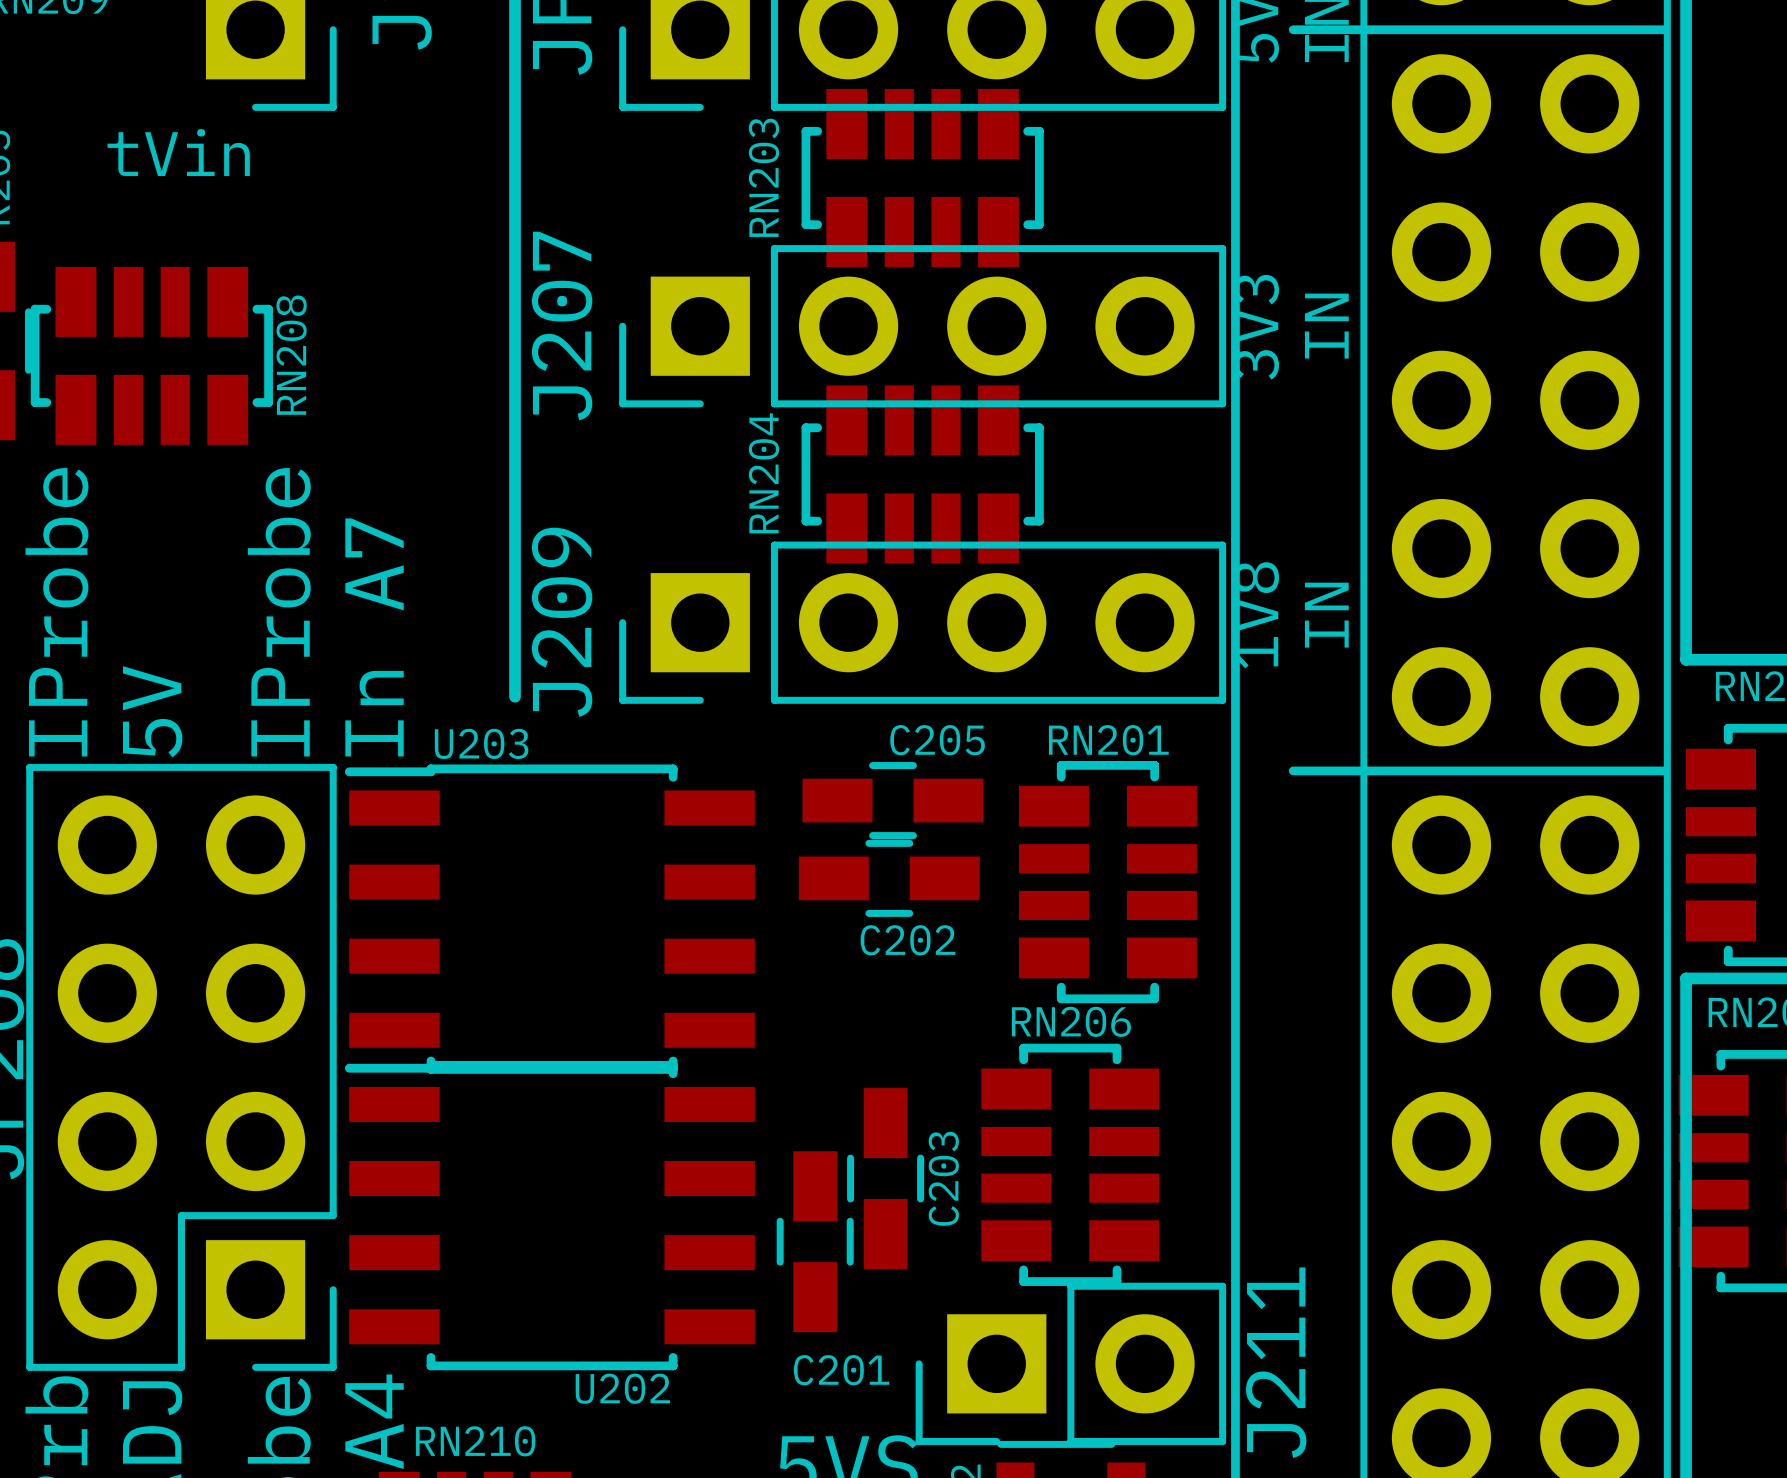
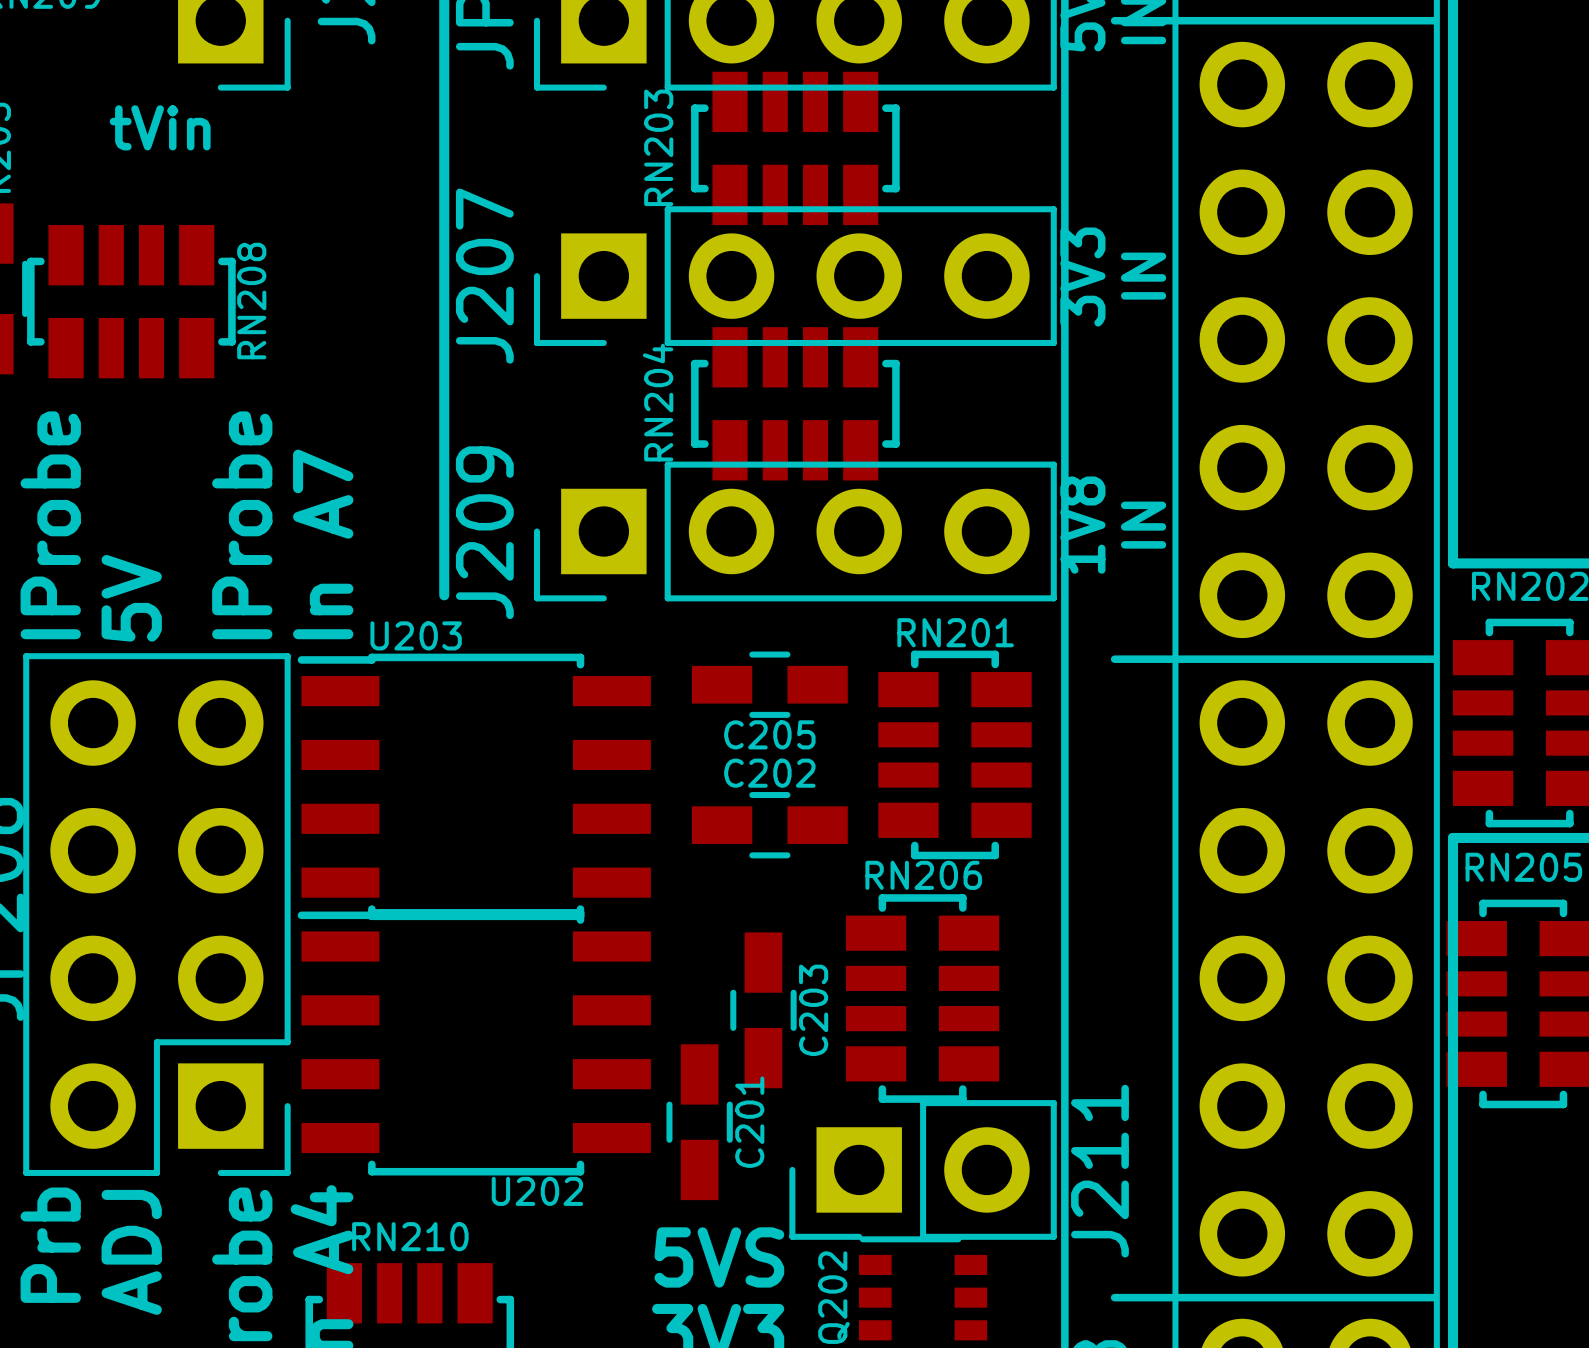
C205 name position: C205 (937, 740) -> C205 (769, 734)
C202 position: (889, 878) -> (769, 825)
C202 name position: C202 (907, 940) -> C202 (769, 773)
C201 position: (815, 1241) -> (699, 1122)
C201 name rotation: 0° (841, 1370) -> 90° counterclockwise (749, 1122)

